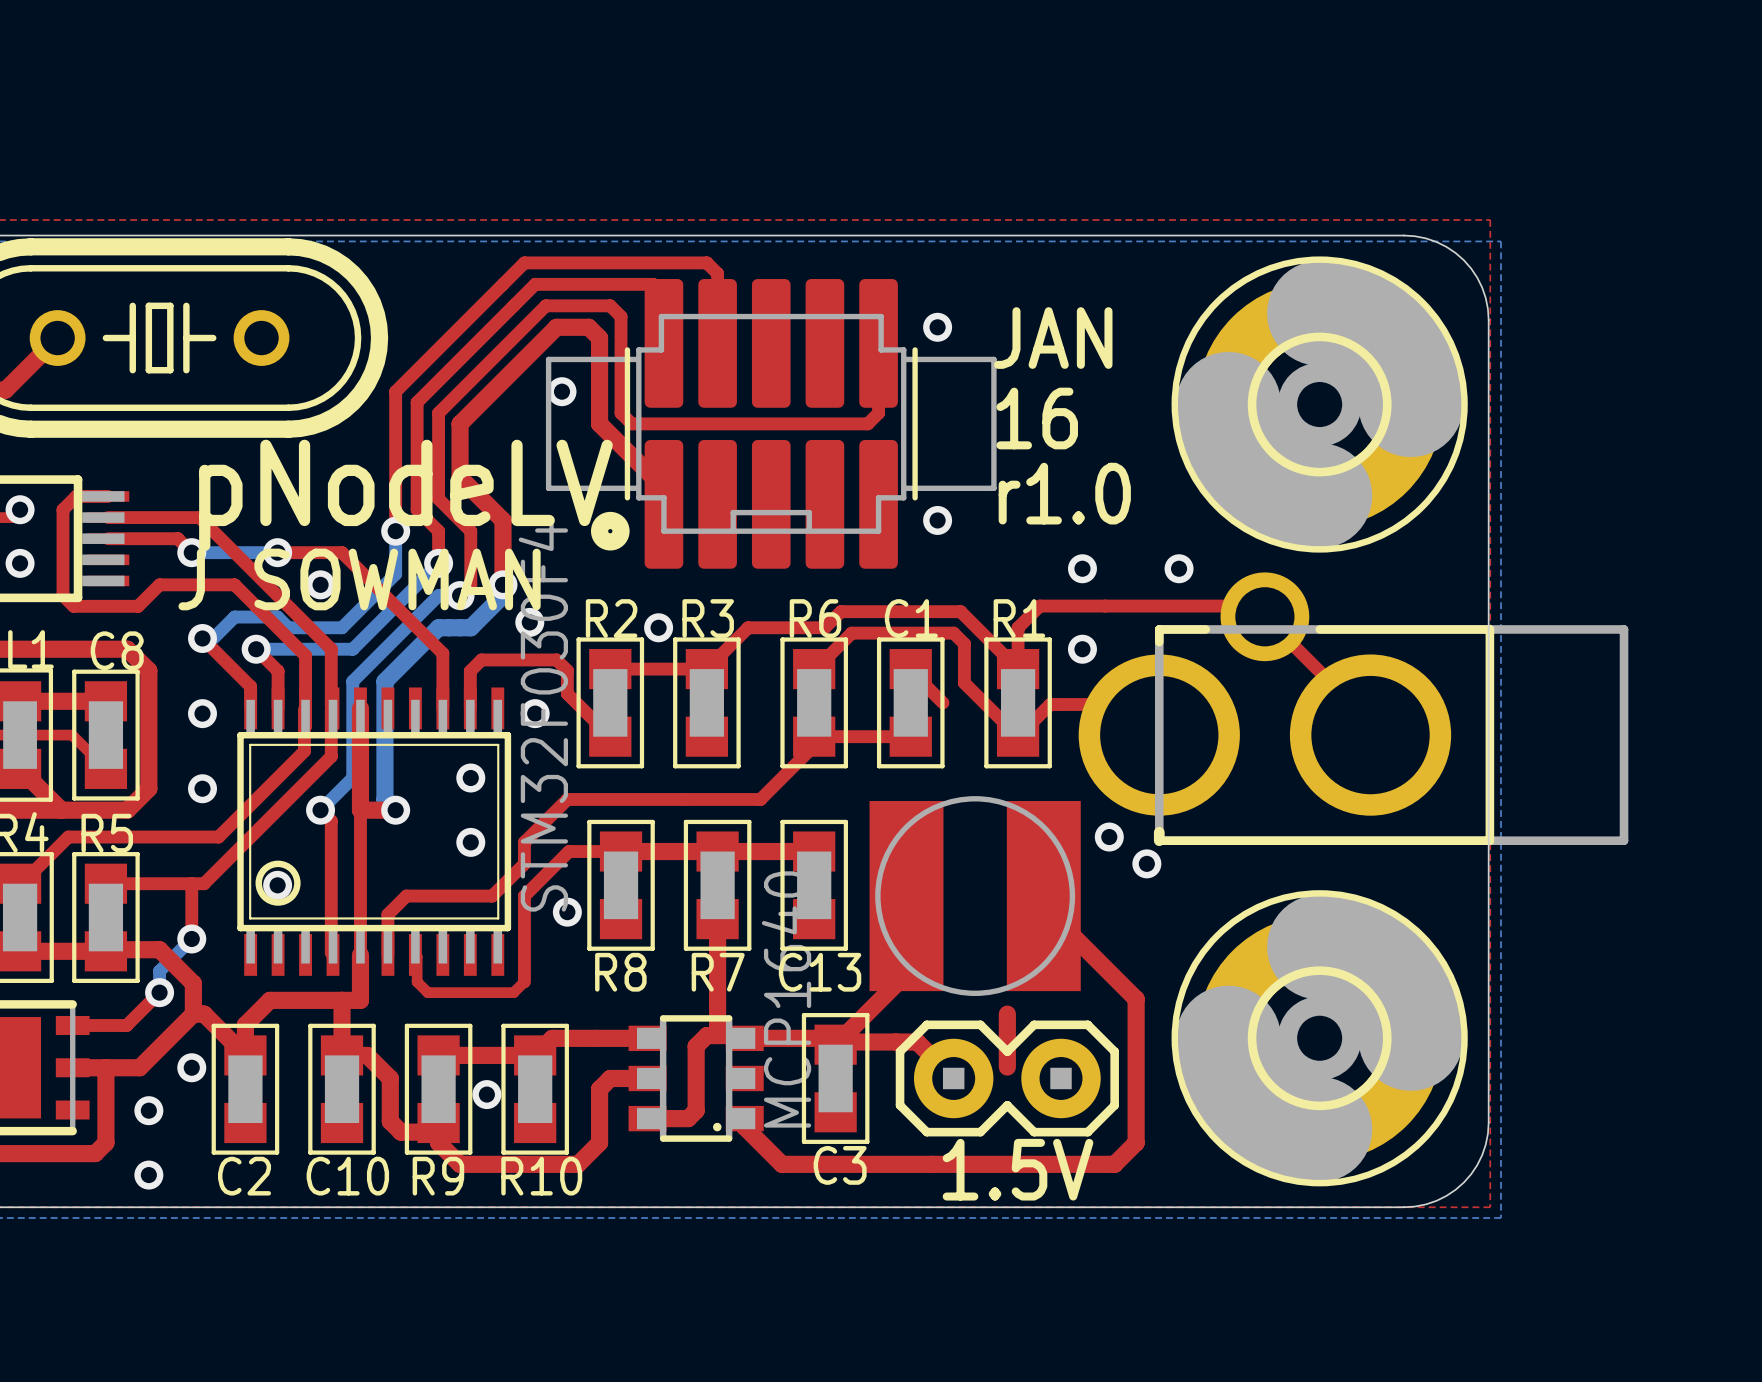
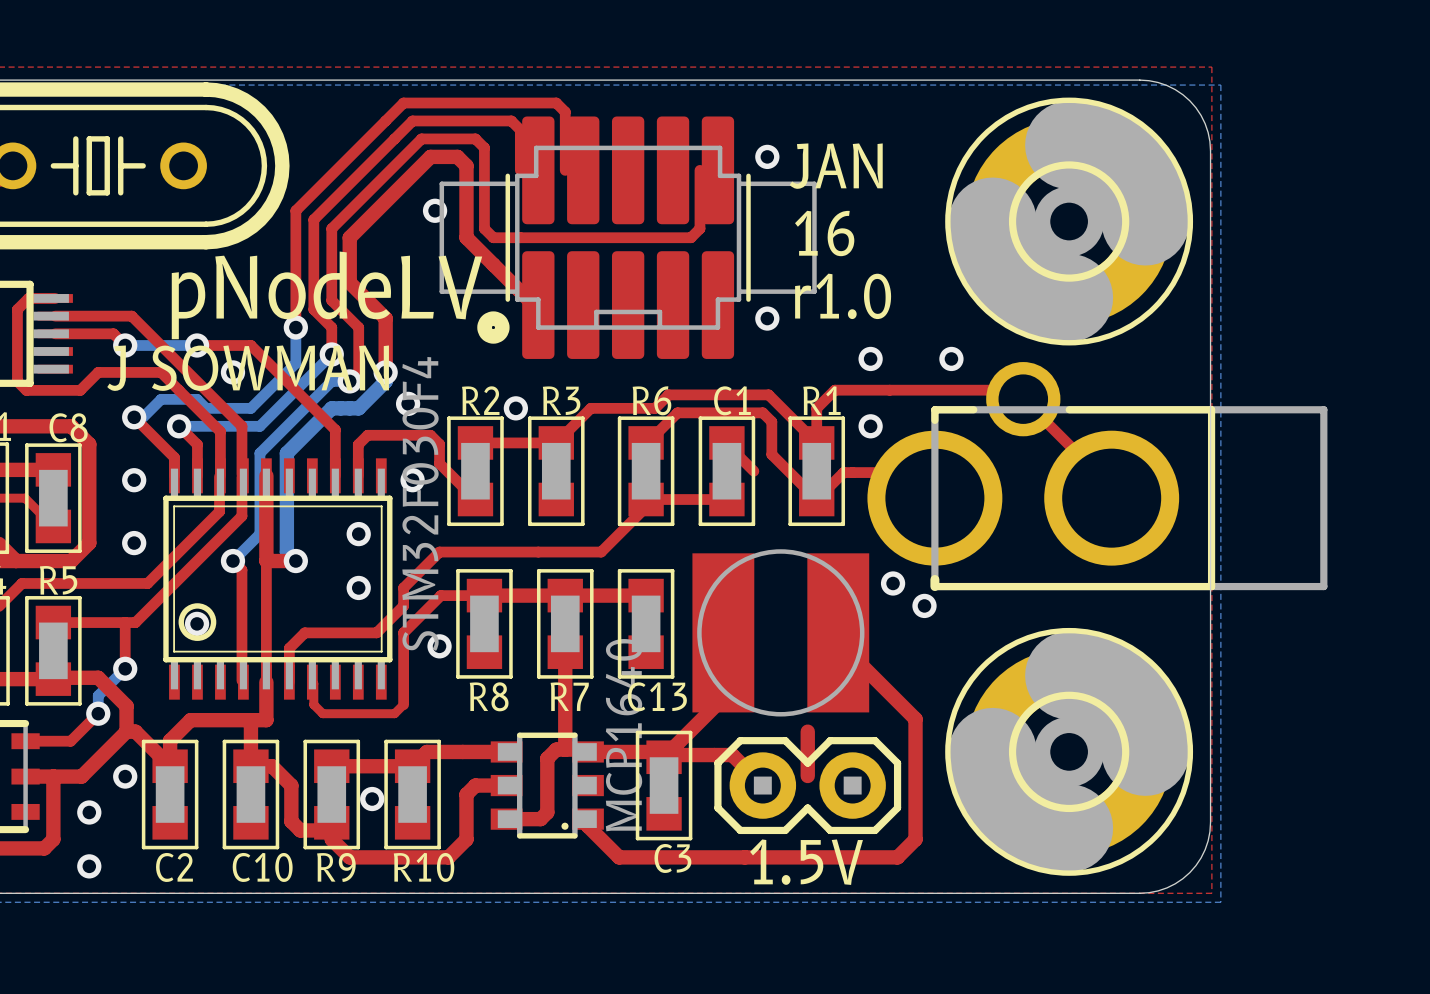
via position: (937, 327) -> (767, 156)
part position: (771, 423) -> (628, 237)
via position: (937, 520) -> (767, 318)

